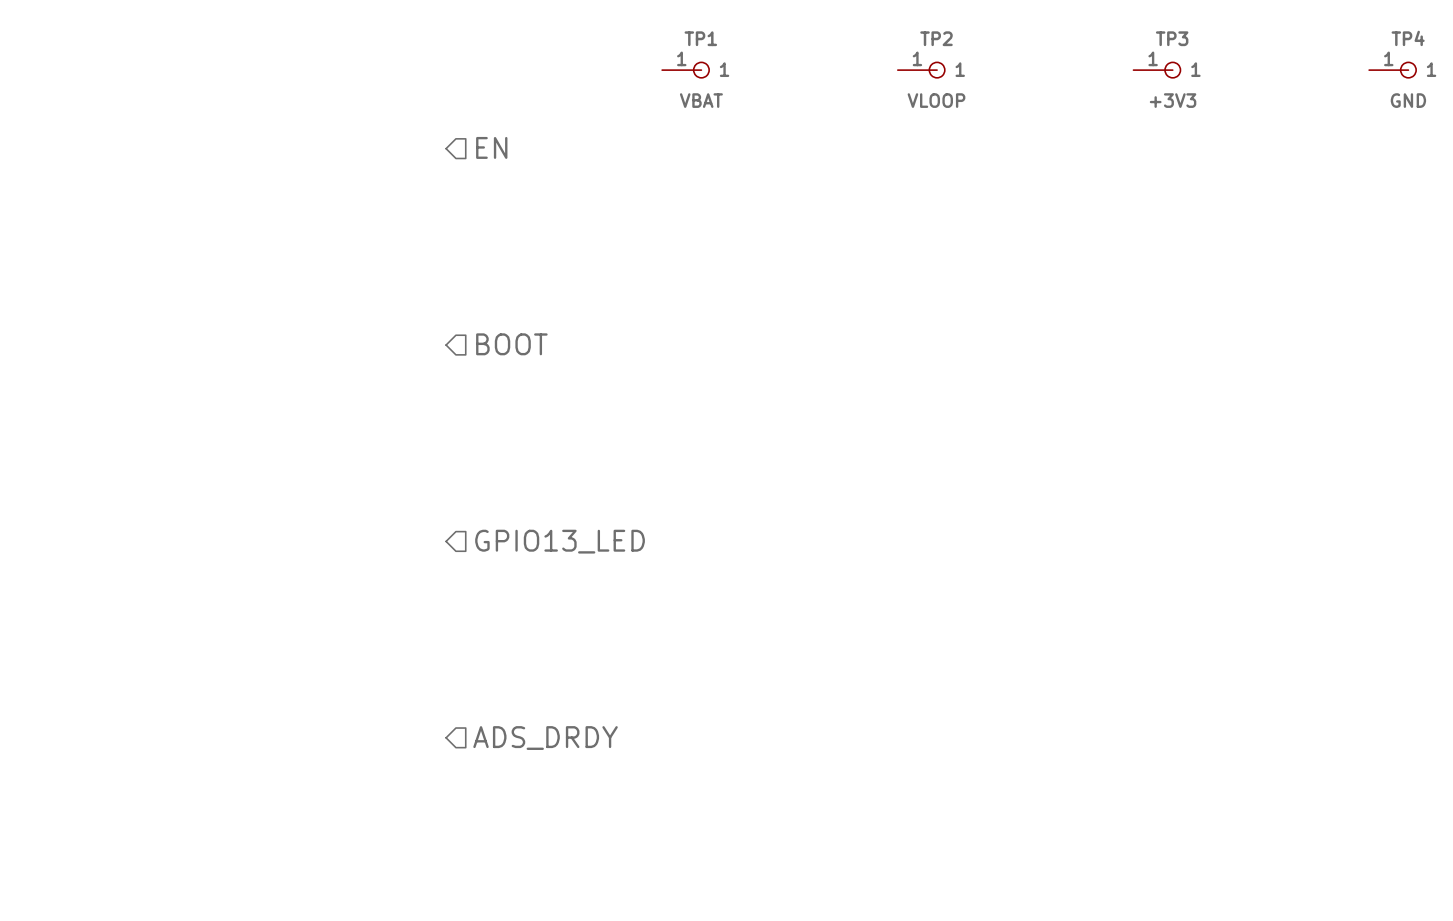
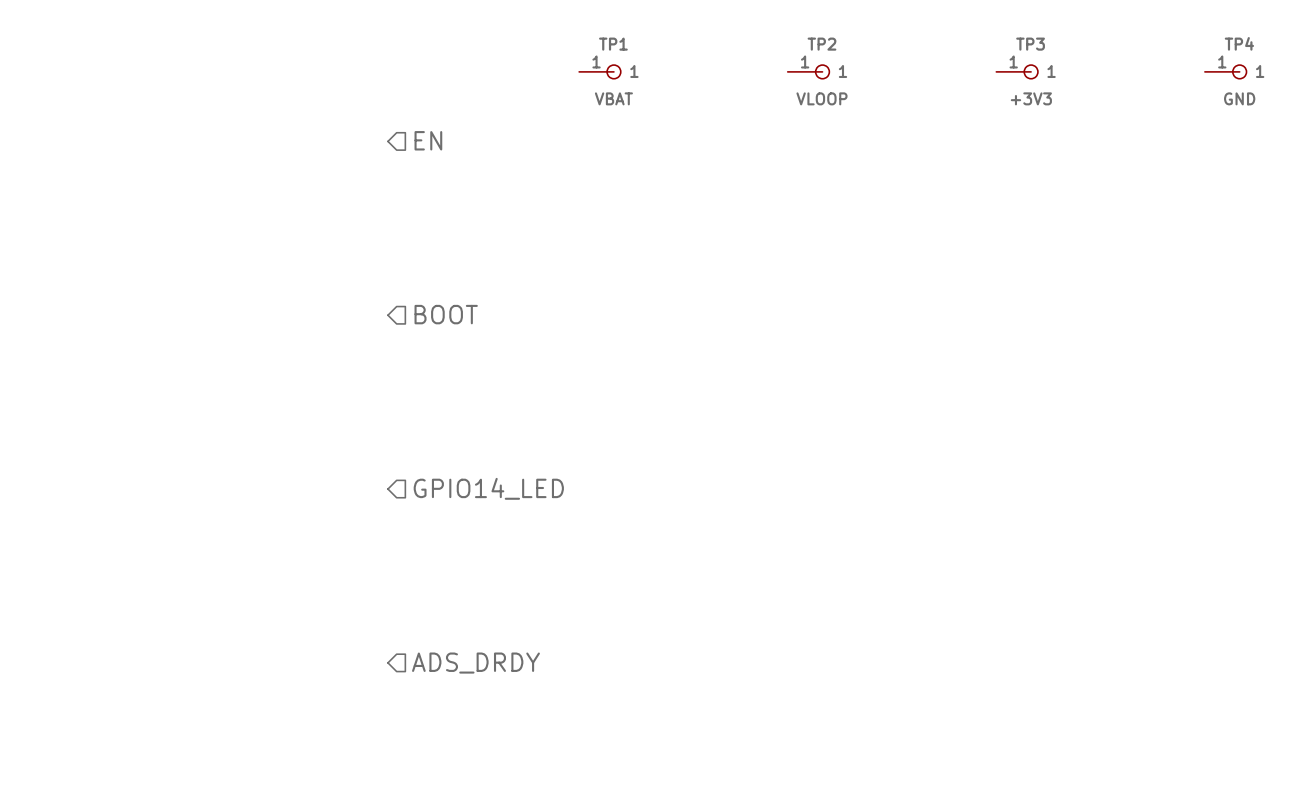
hierarchical label: GPIO13_LED (560, 541) -> GPIO14_LED (488, 488)

